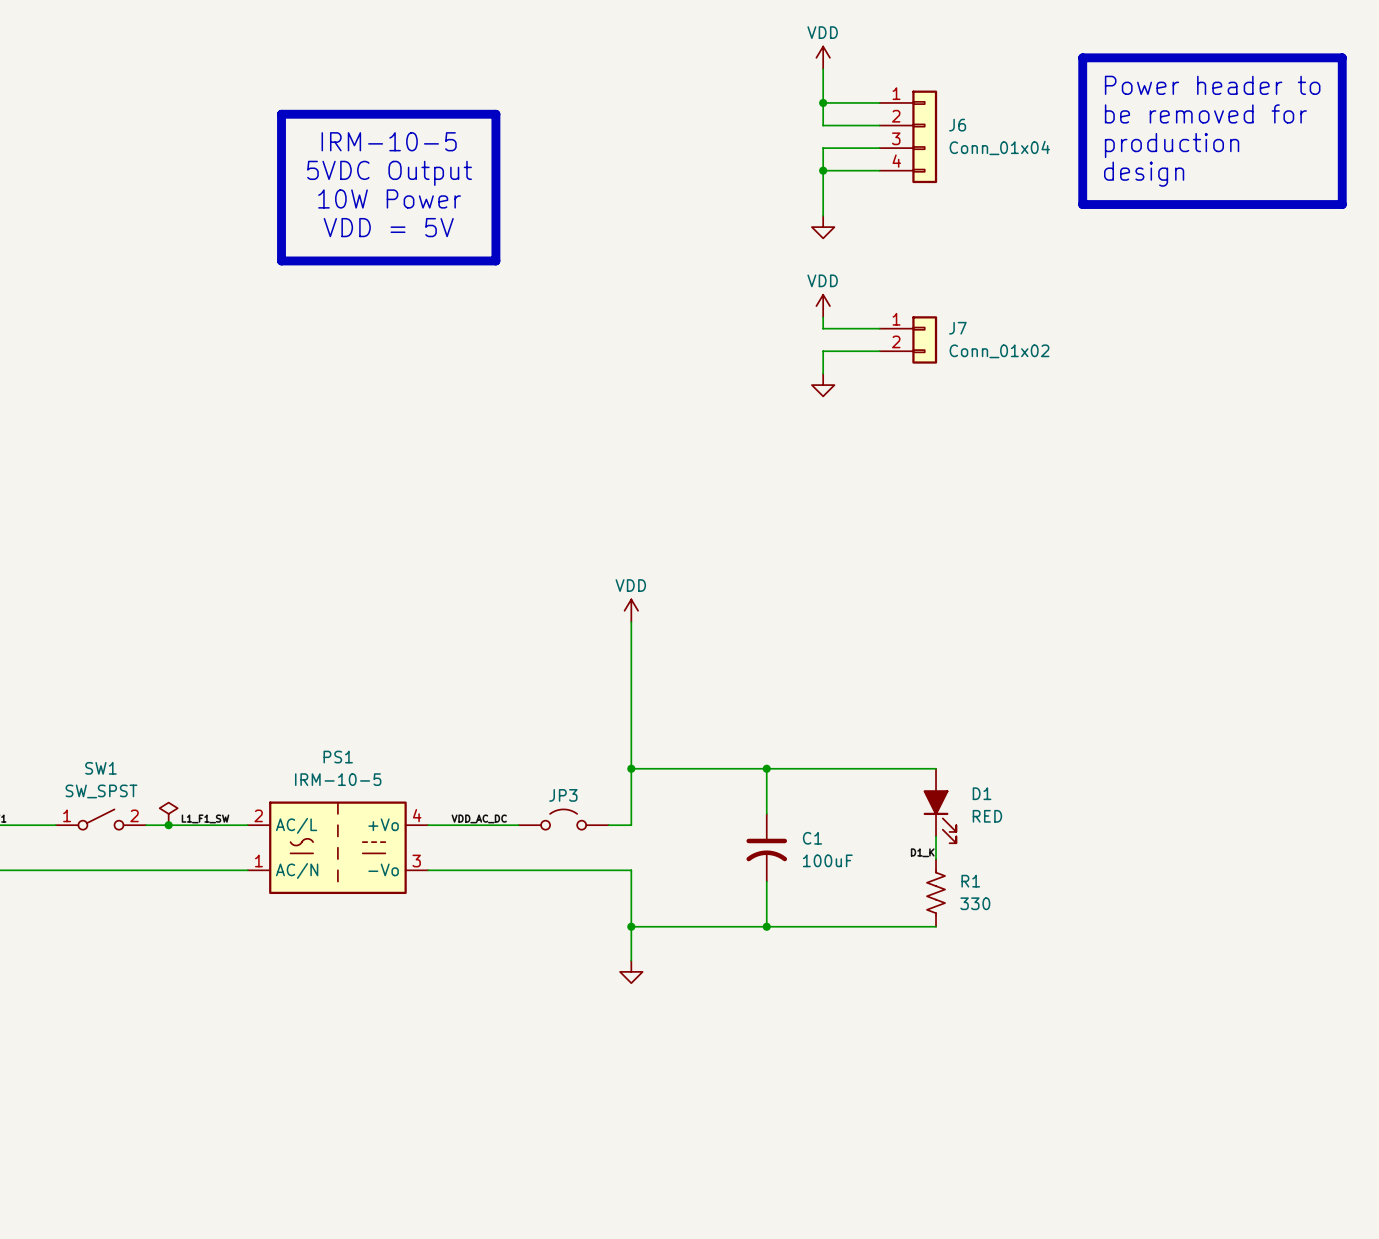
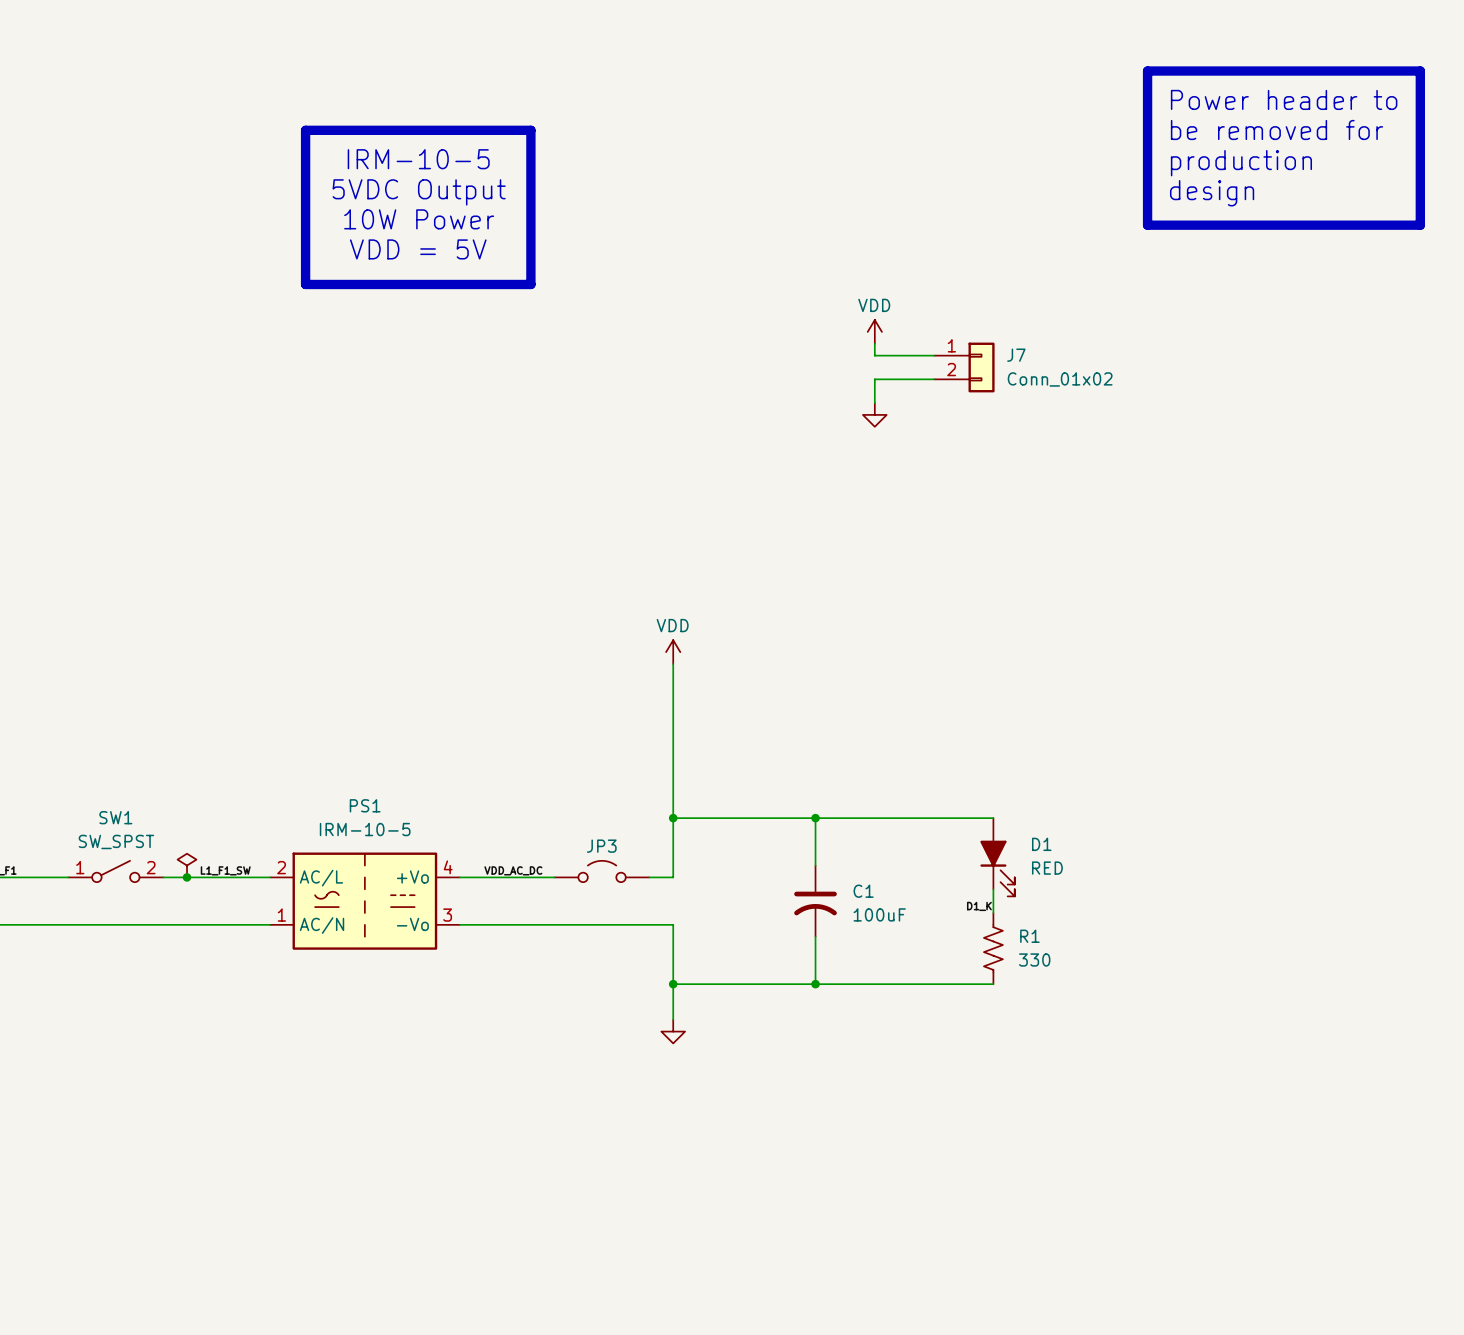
power symbol: VDD (823, 57) -> none
wire: (823, 69) (823, 125) (879, 125) -> none
wire: (823, 102) (879, 102) -> none
junction: (823, 102) -> none
J6: Conn_01x04 (908, 136) -> none
wire: (879, 148) (823, 148) (823, 215) -> none
wire: (823, 170) (879, 170) -> none
junction: (823, 170) -> none
power symbol: (823, 227) -> none

